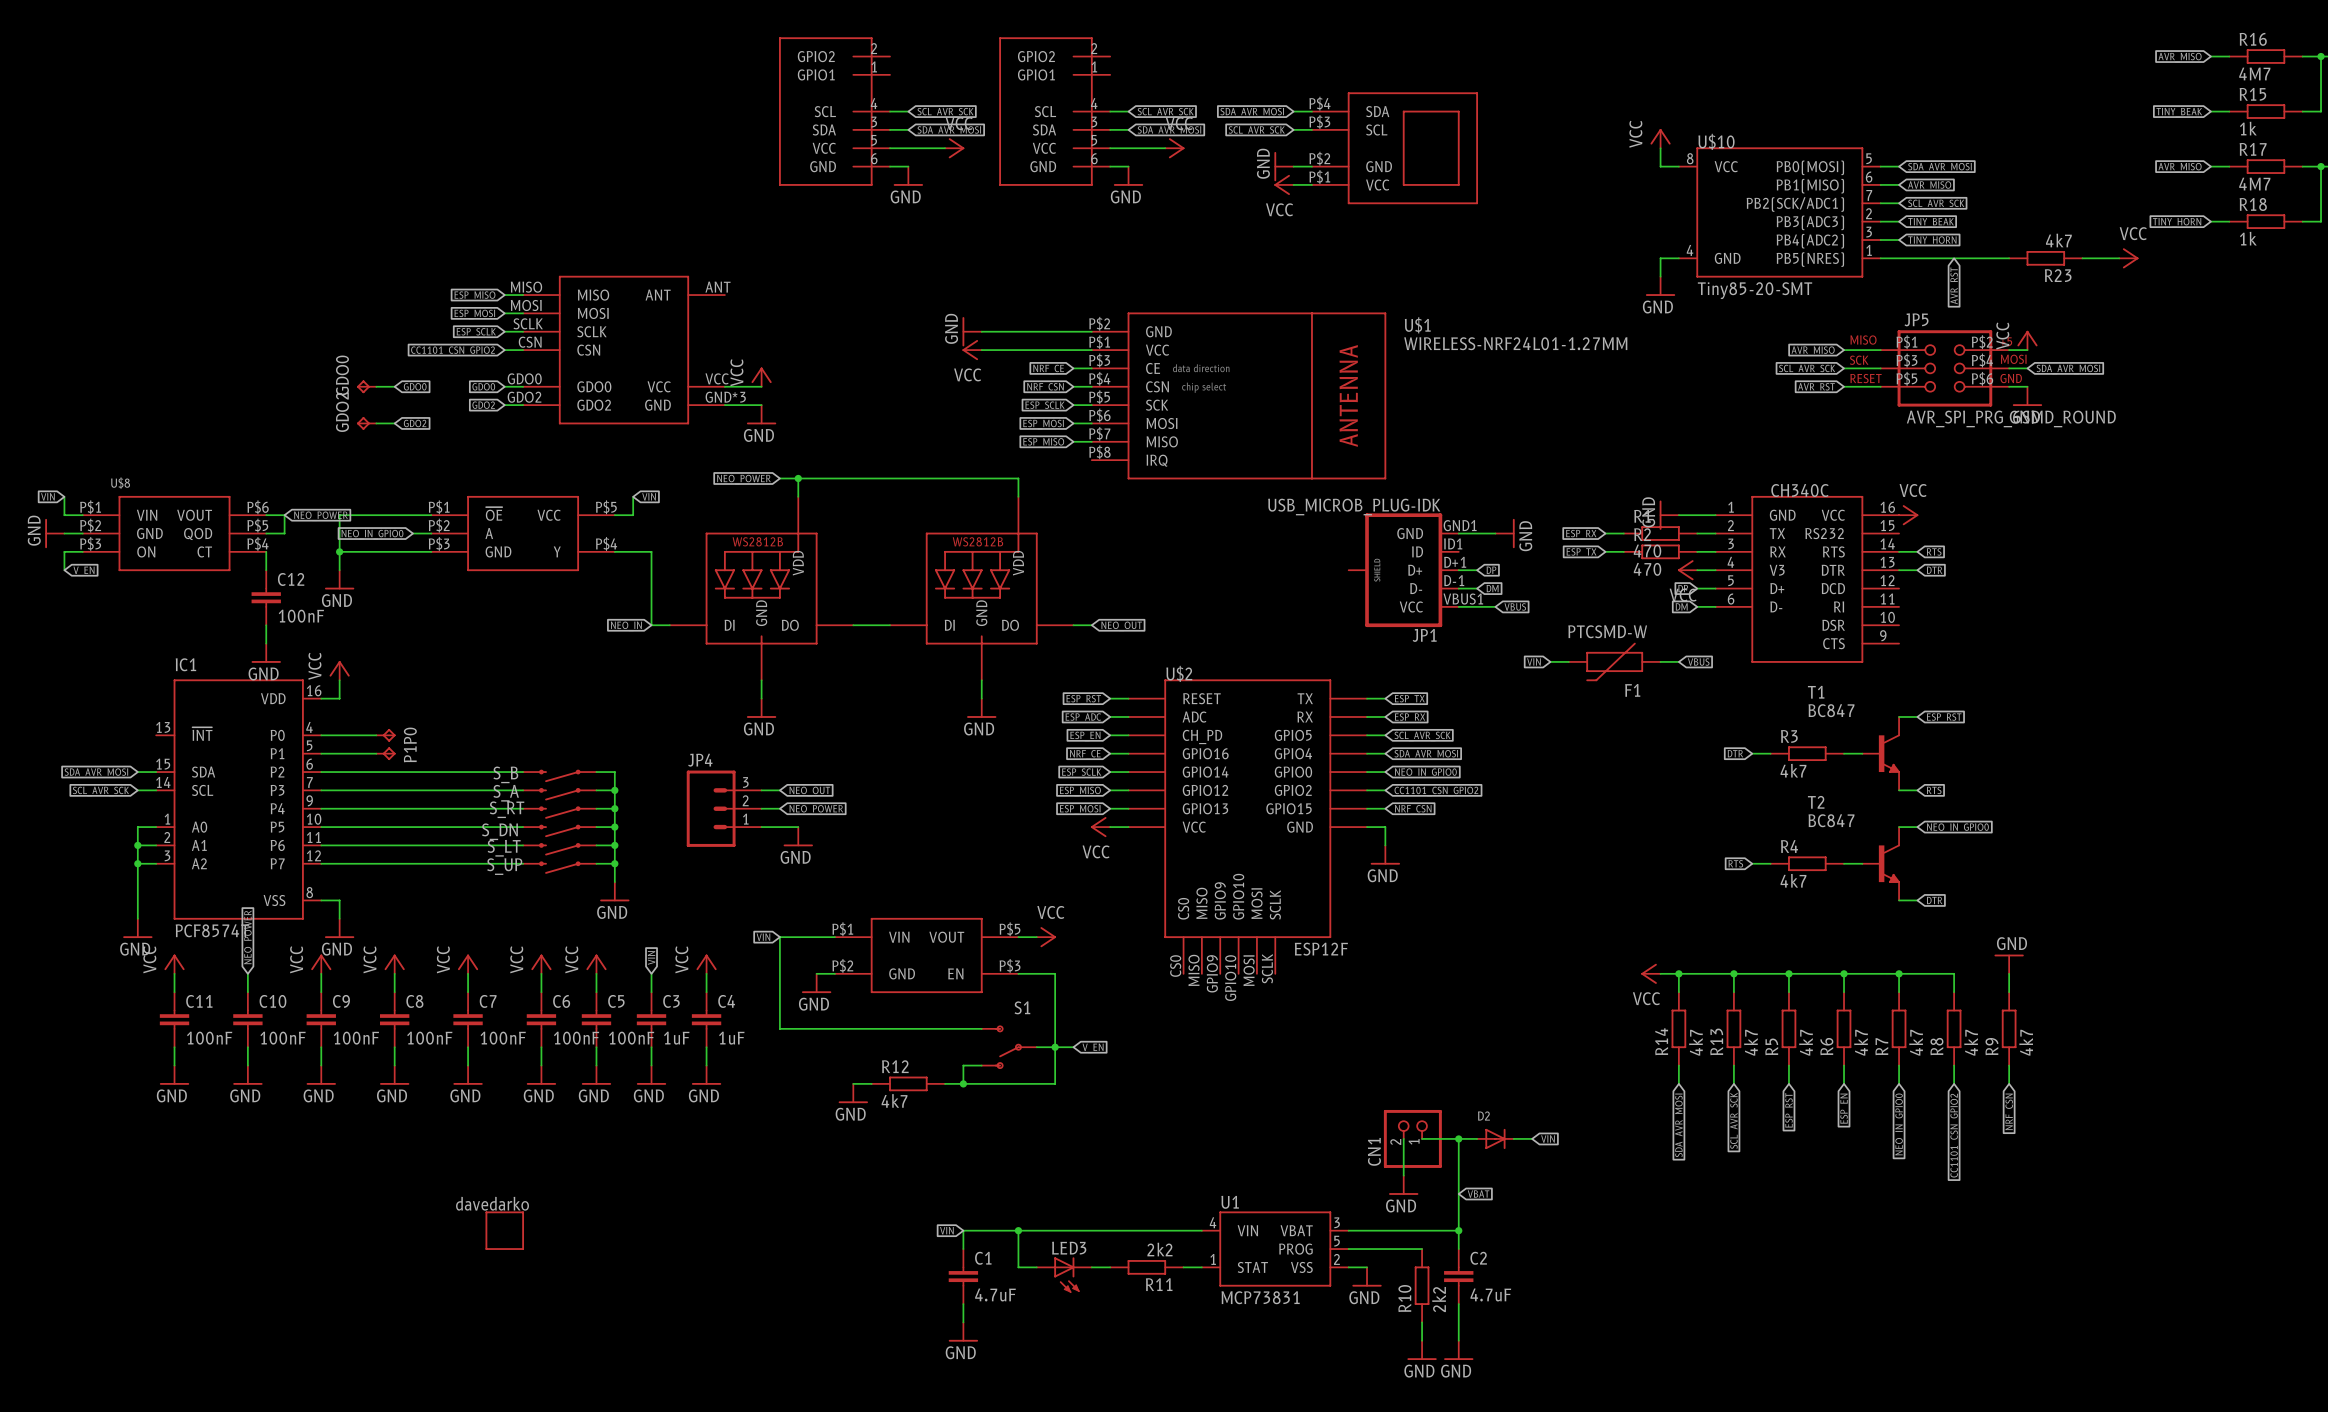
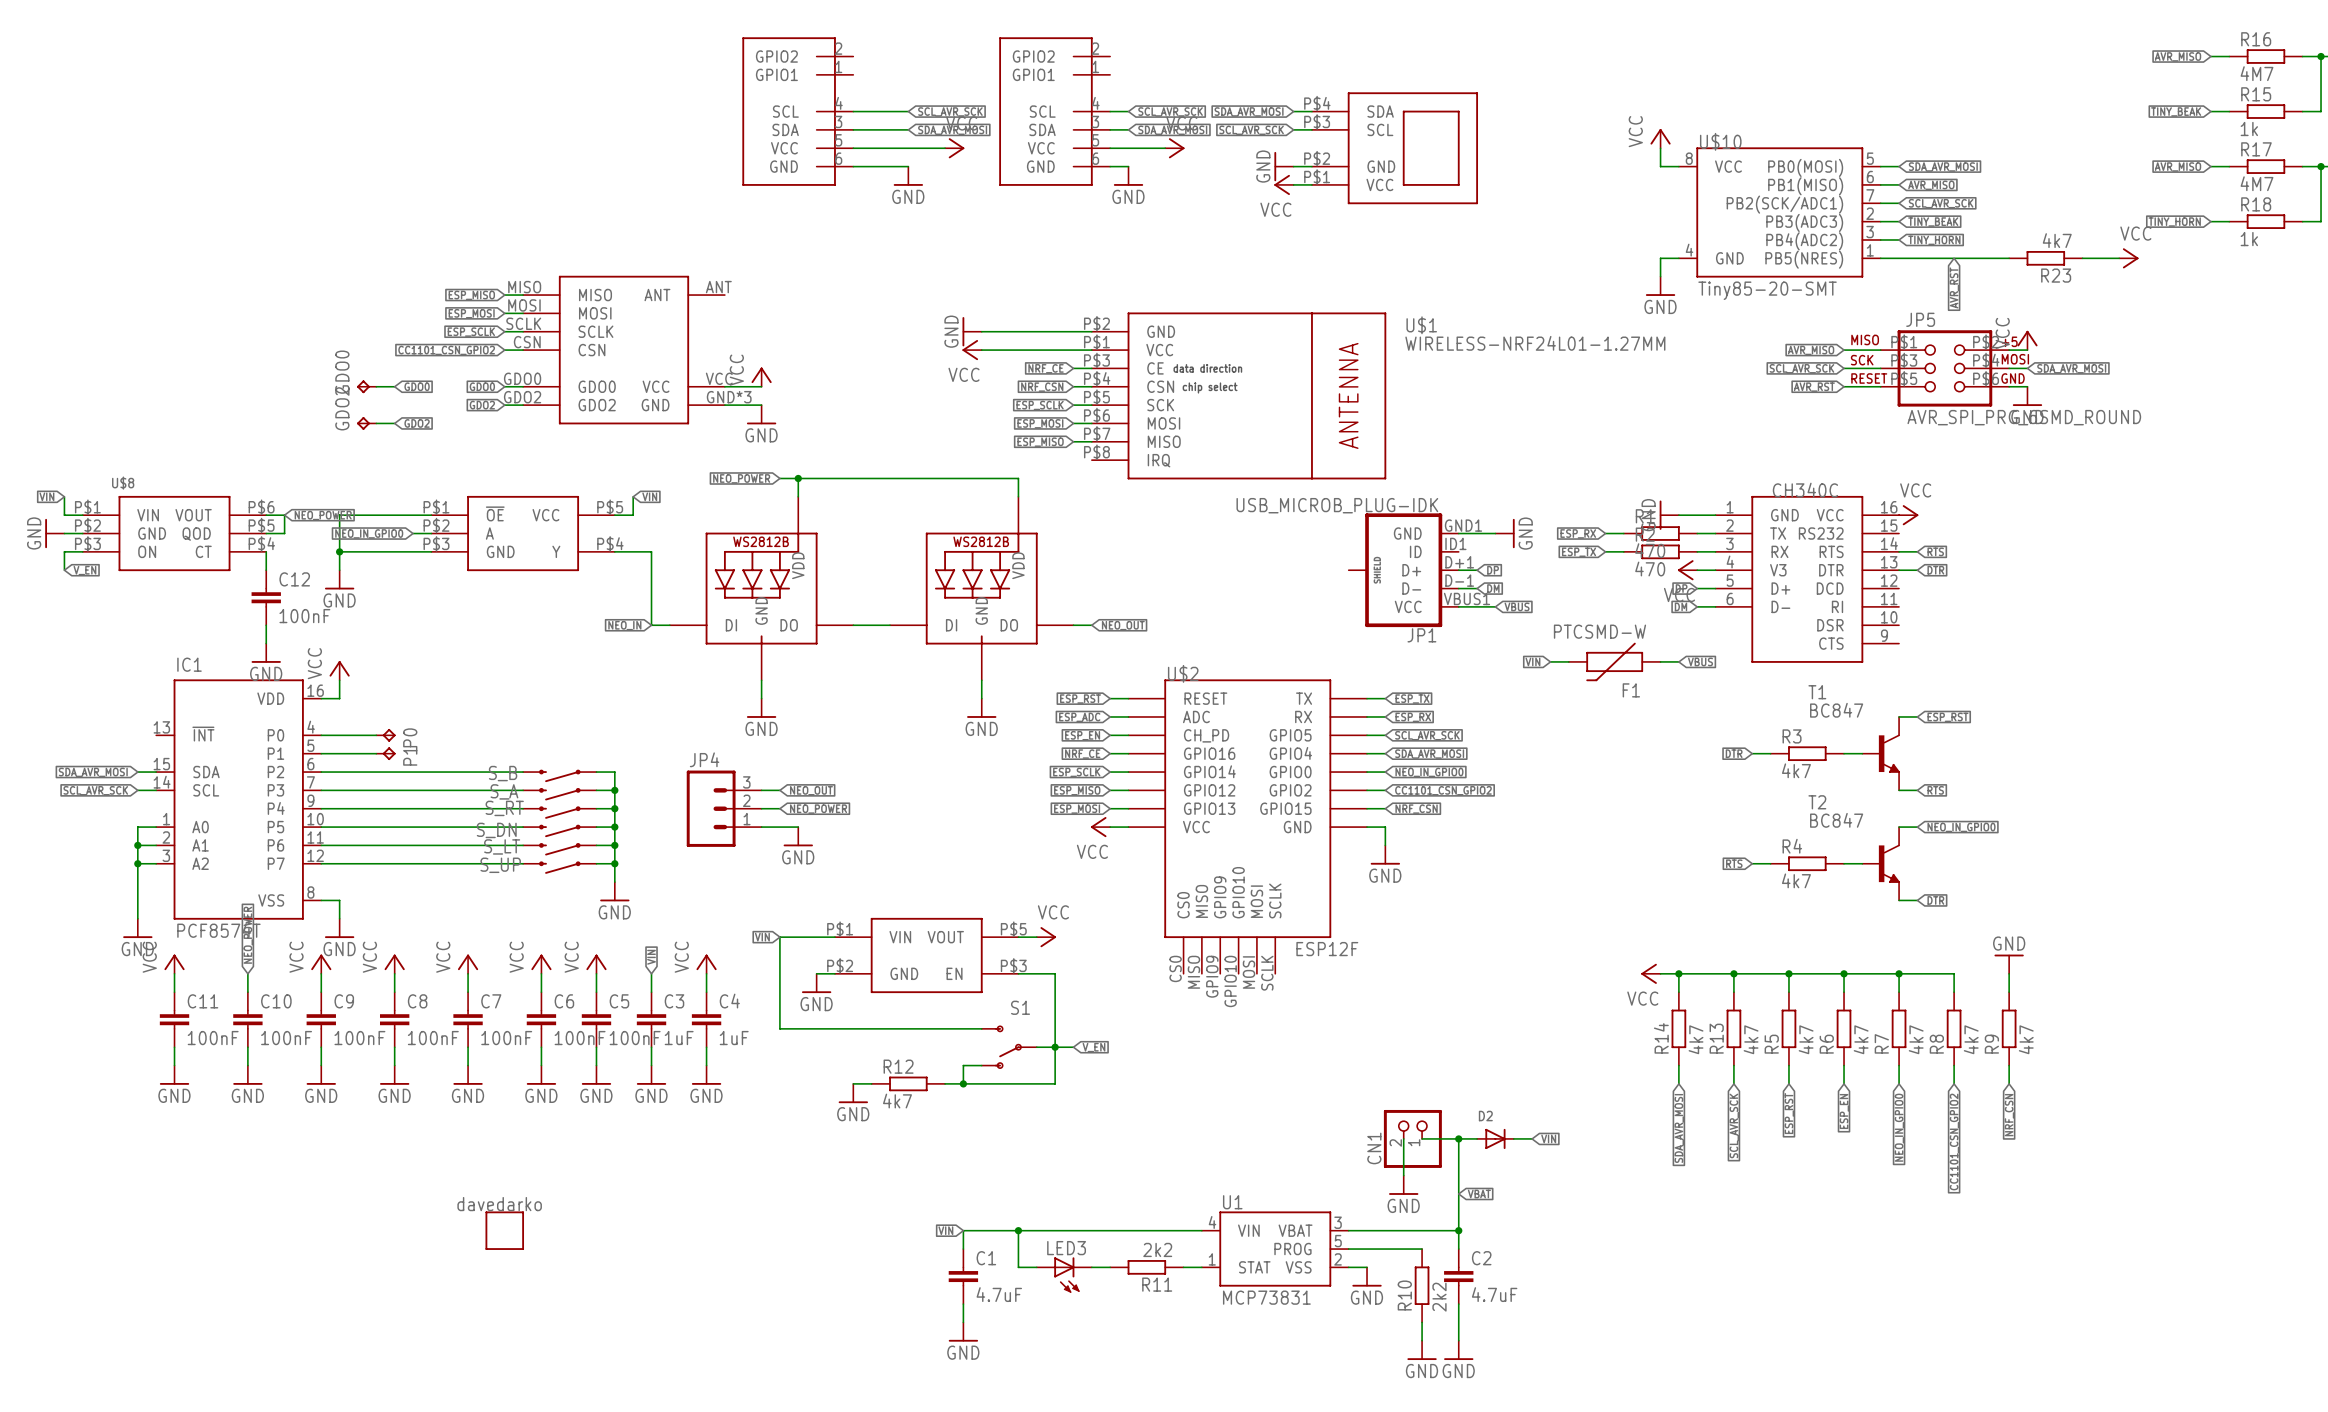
part position: (834, 111) -> (797, 111)

